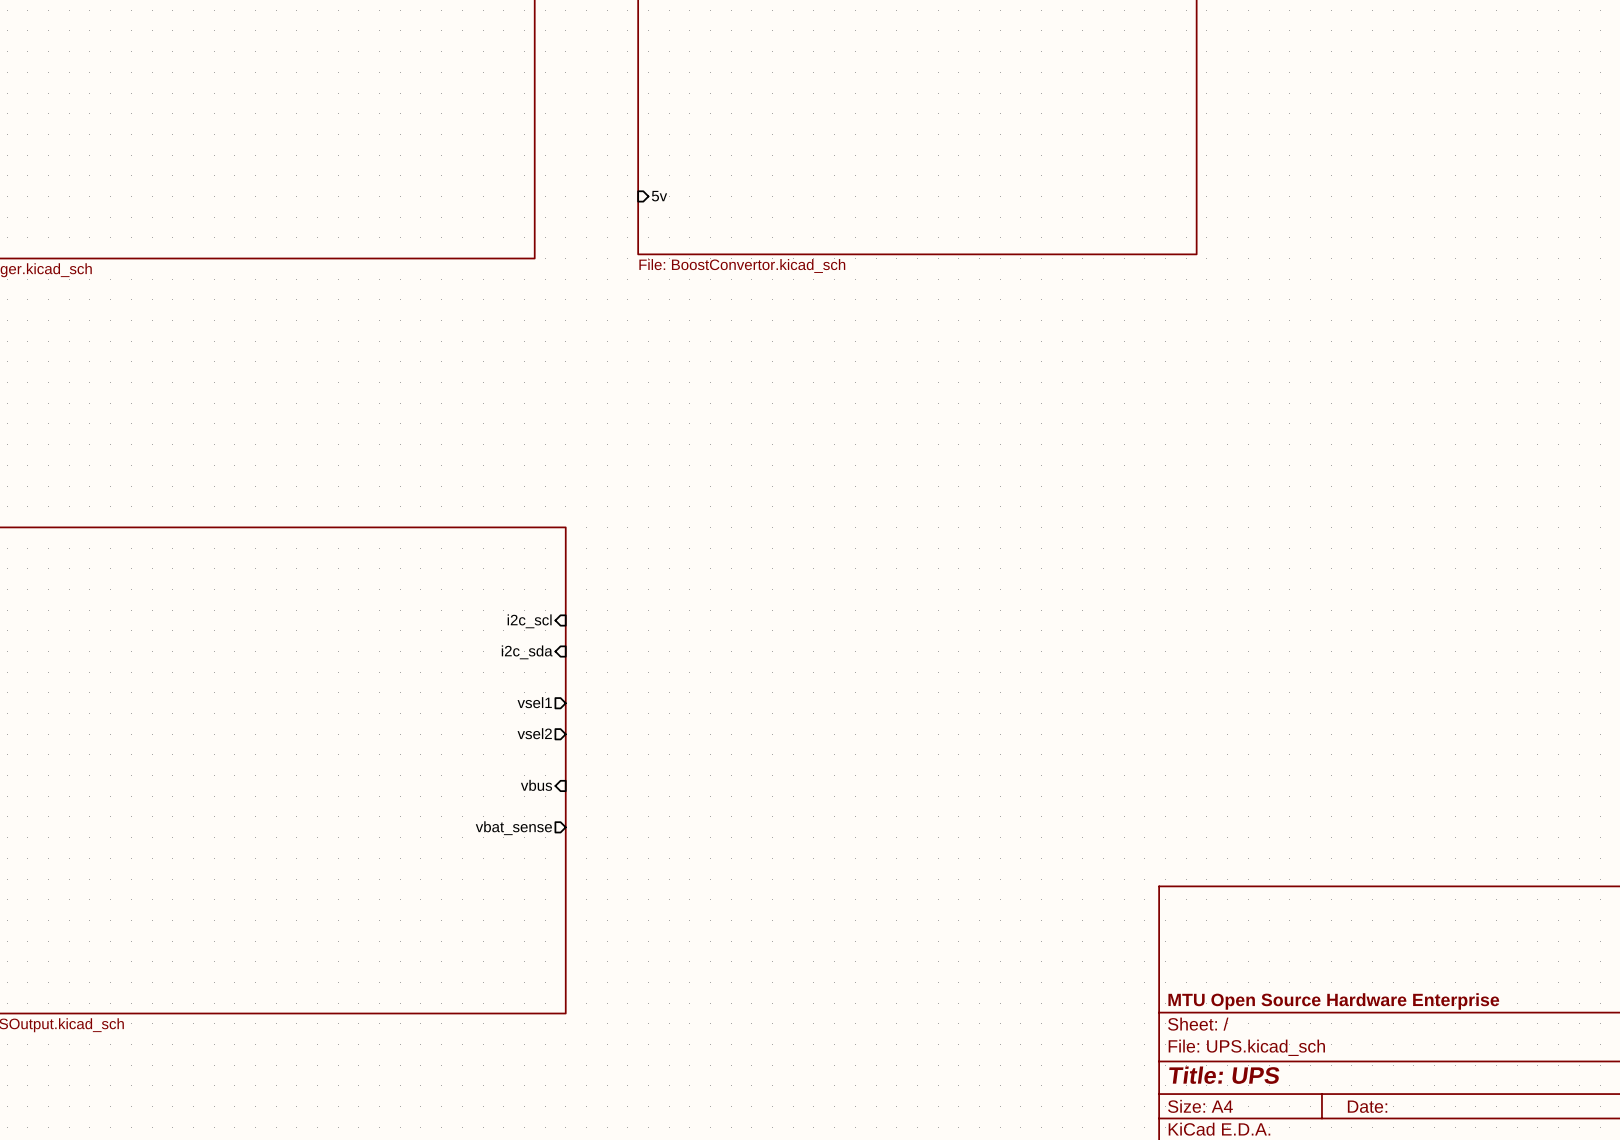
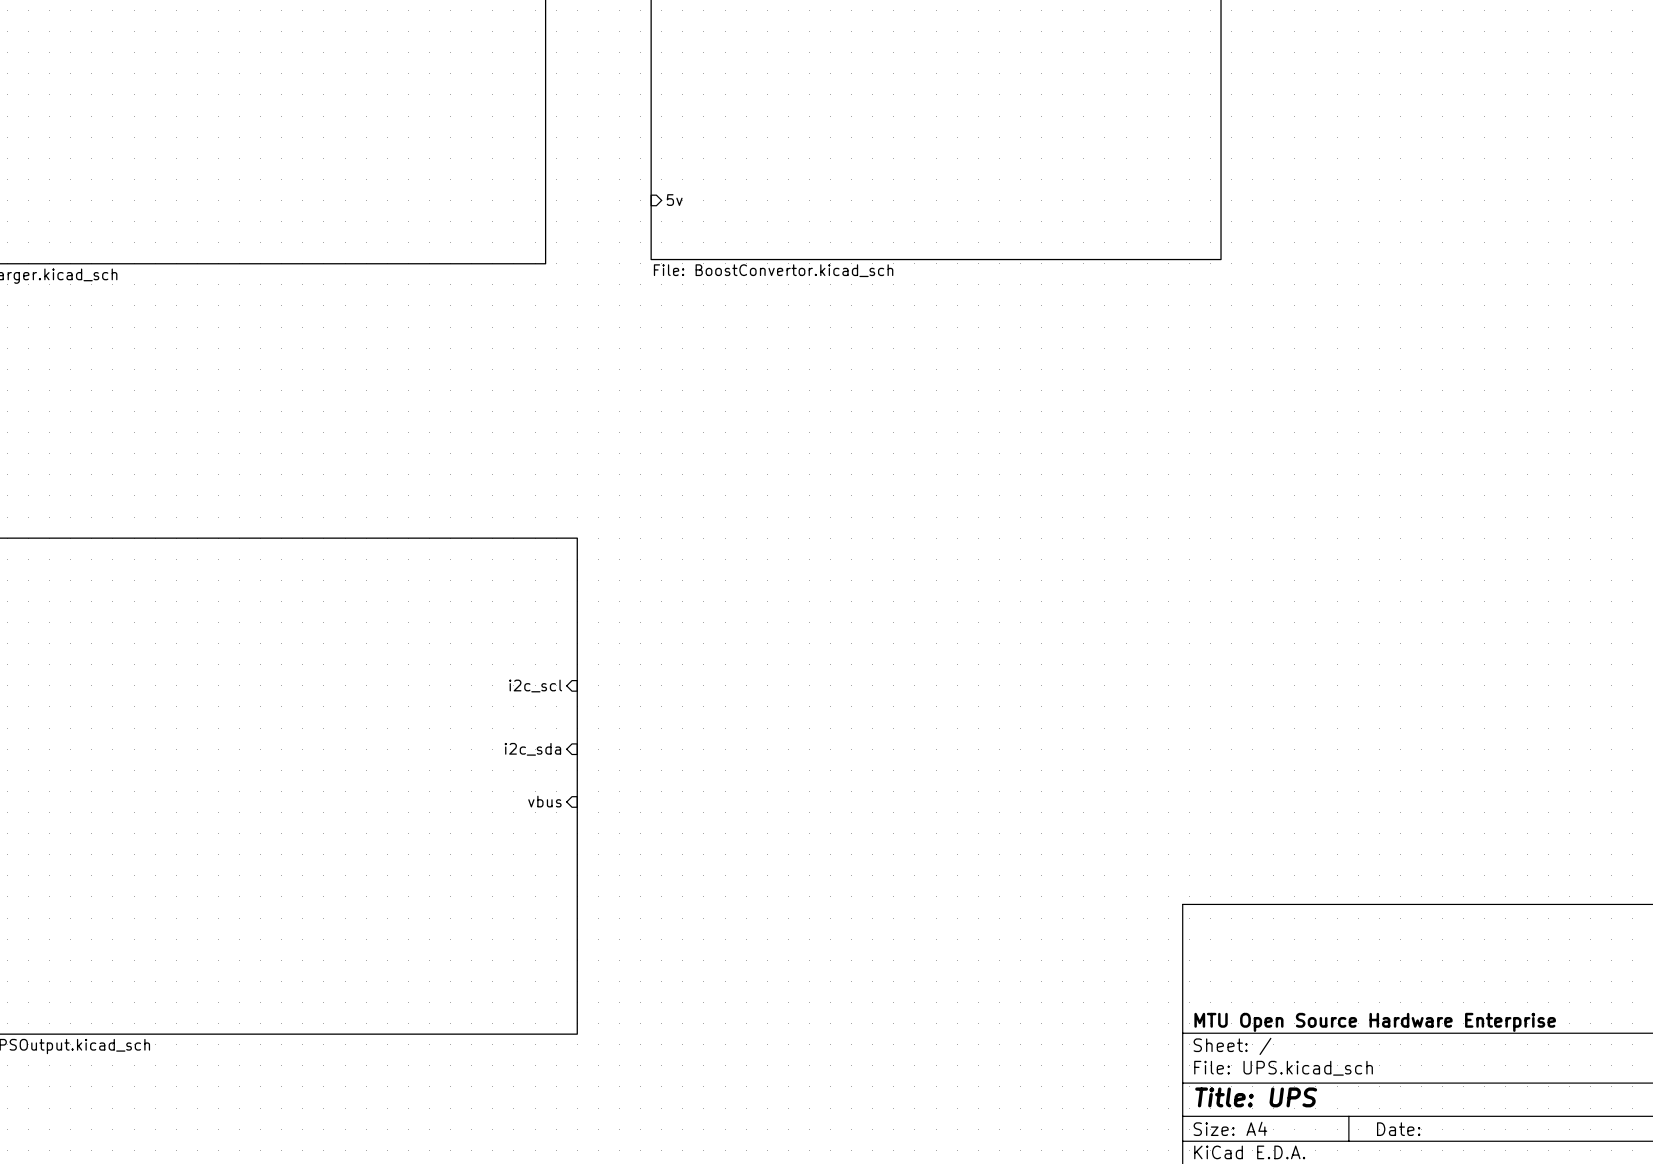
sheet pin position: i2c_scl (529, 621) -> i2c_scl (535, 685)
sheet pin: i2c_sda (527, 652) -> none
sheet pin: vsel1 (534, 702) -> none
sheet pin shape: output (534, 733) -> input (532, 749)
sheet pin: vsel2 (534, 733) -> i2c_sda (532, 749)
sheet pin: vbat_sense (513, 828) -> none

